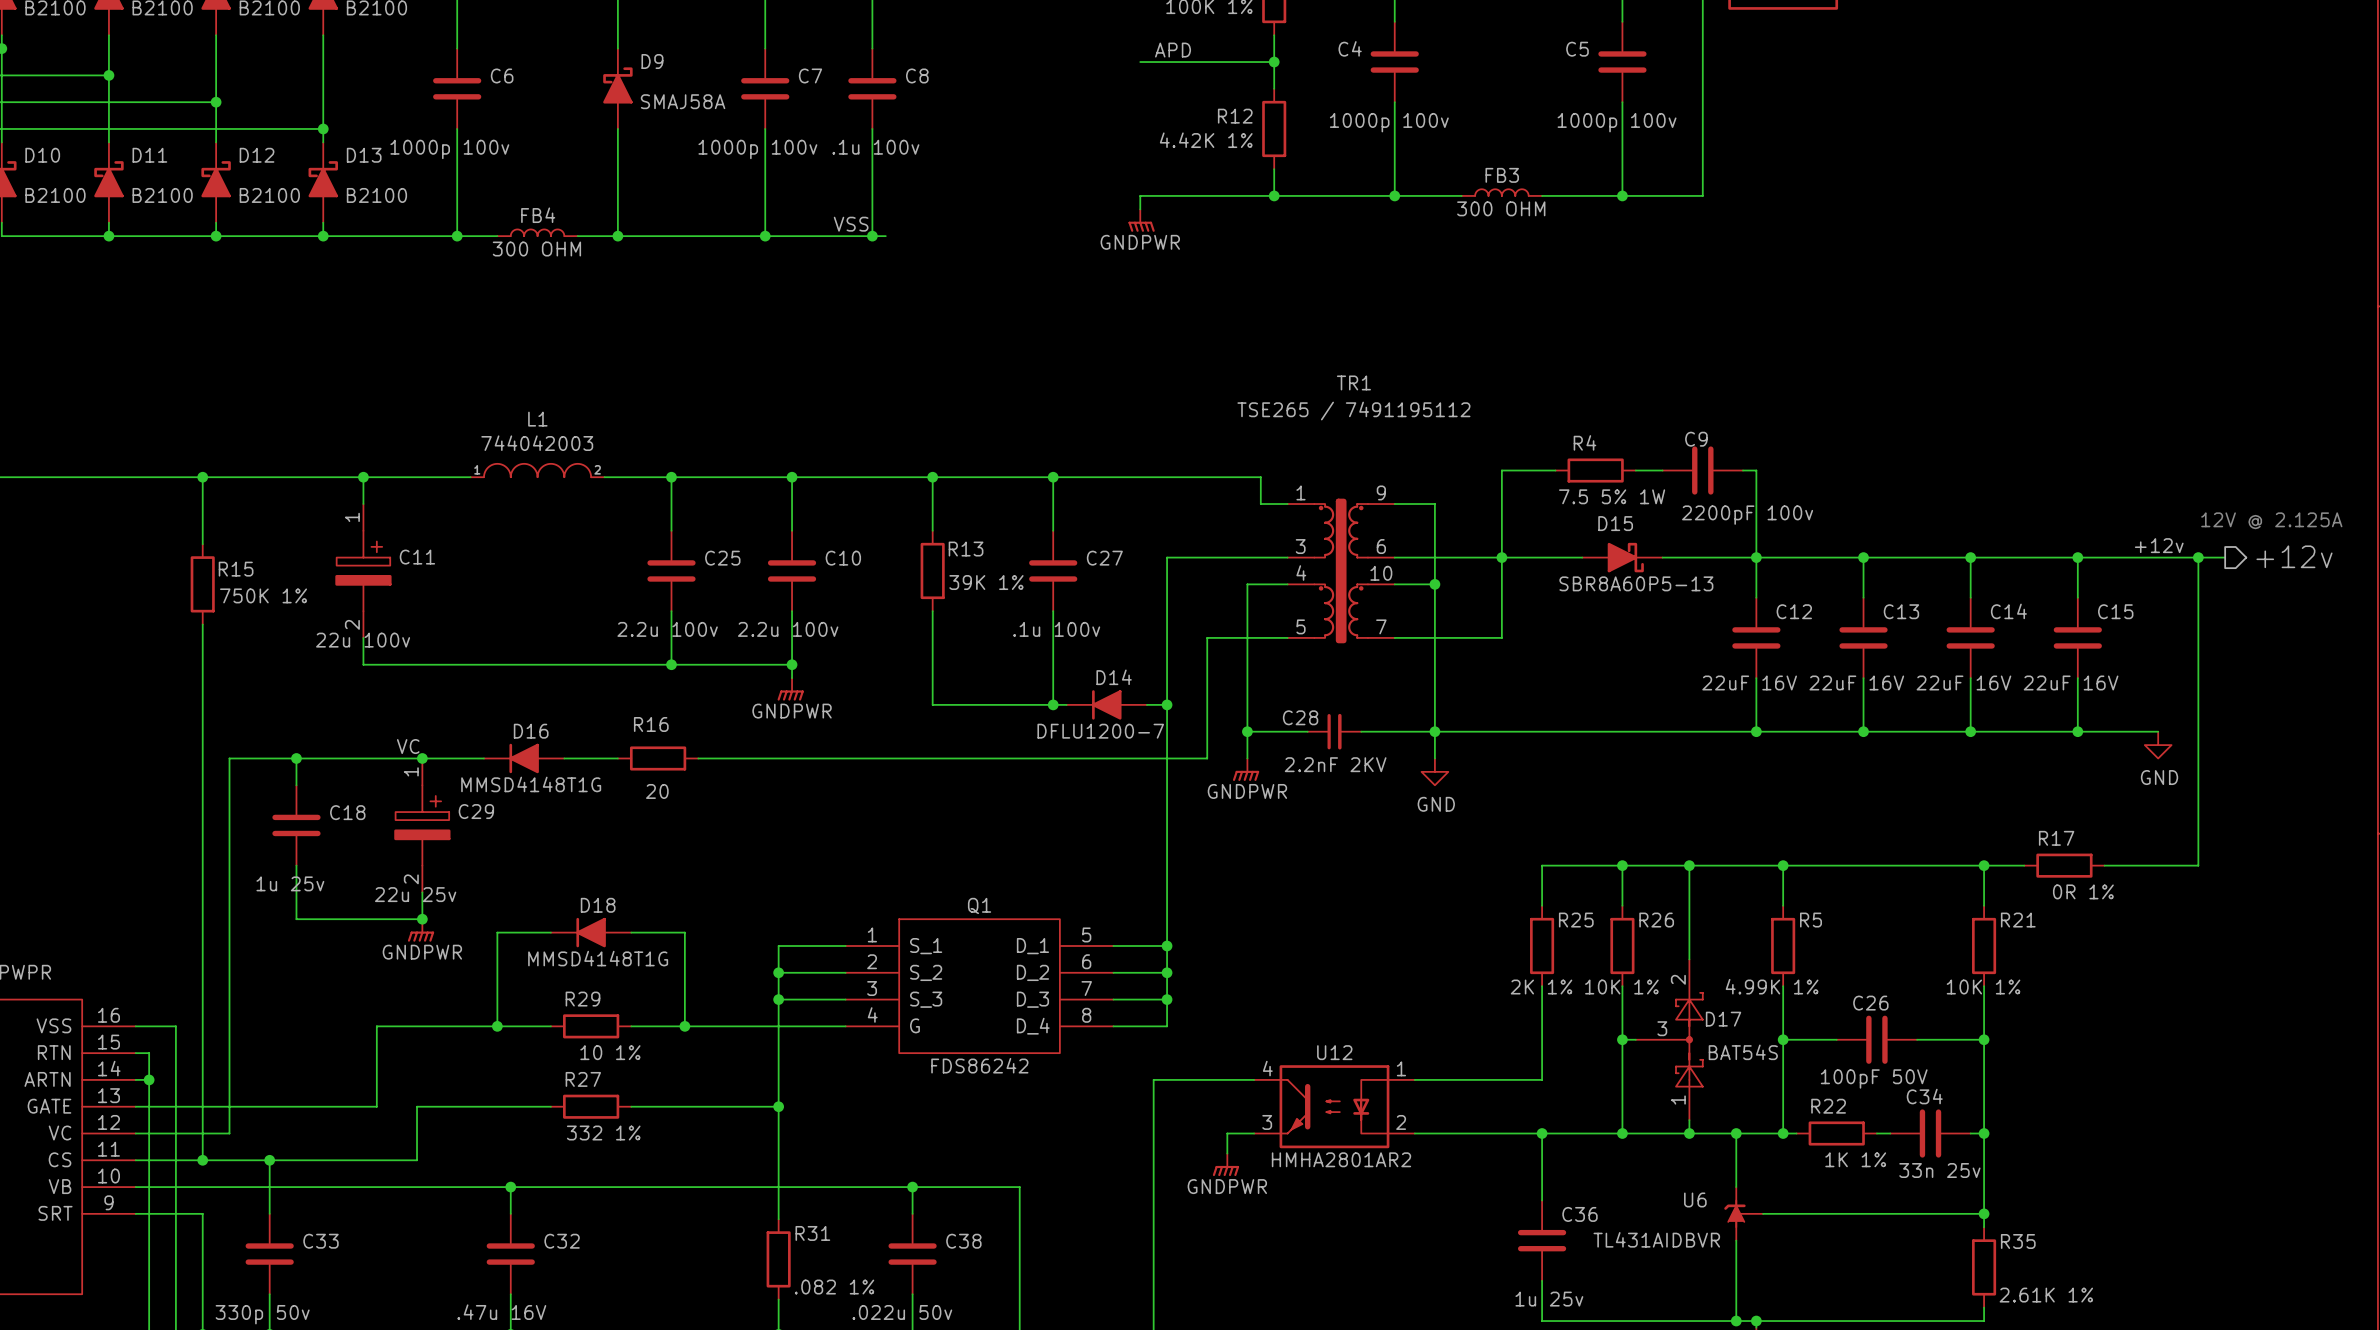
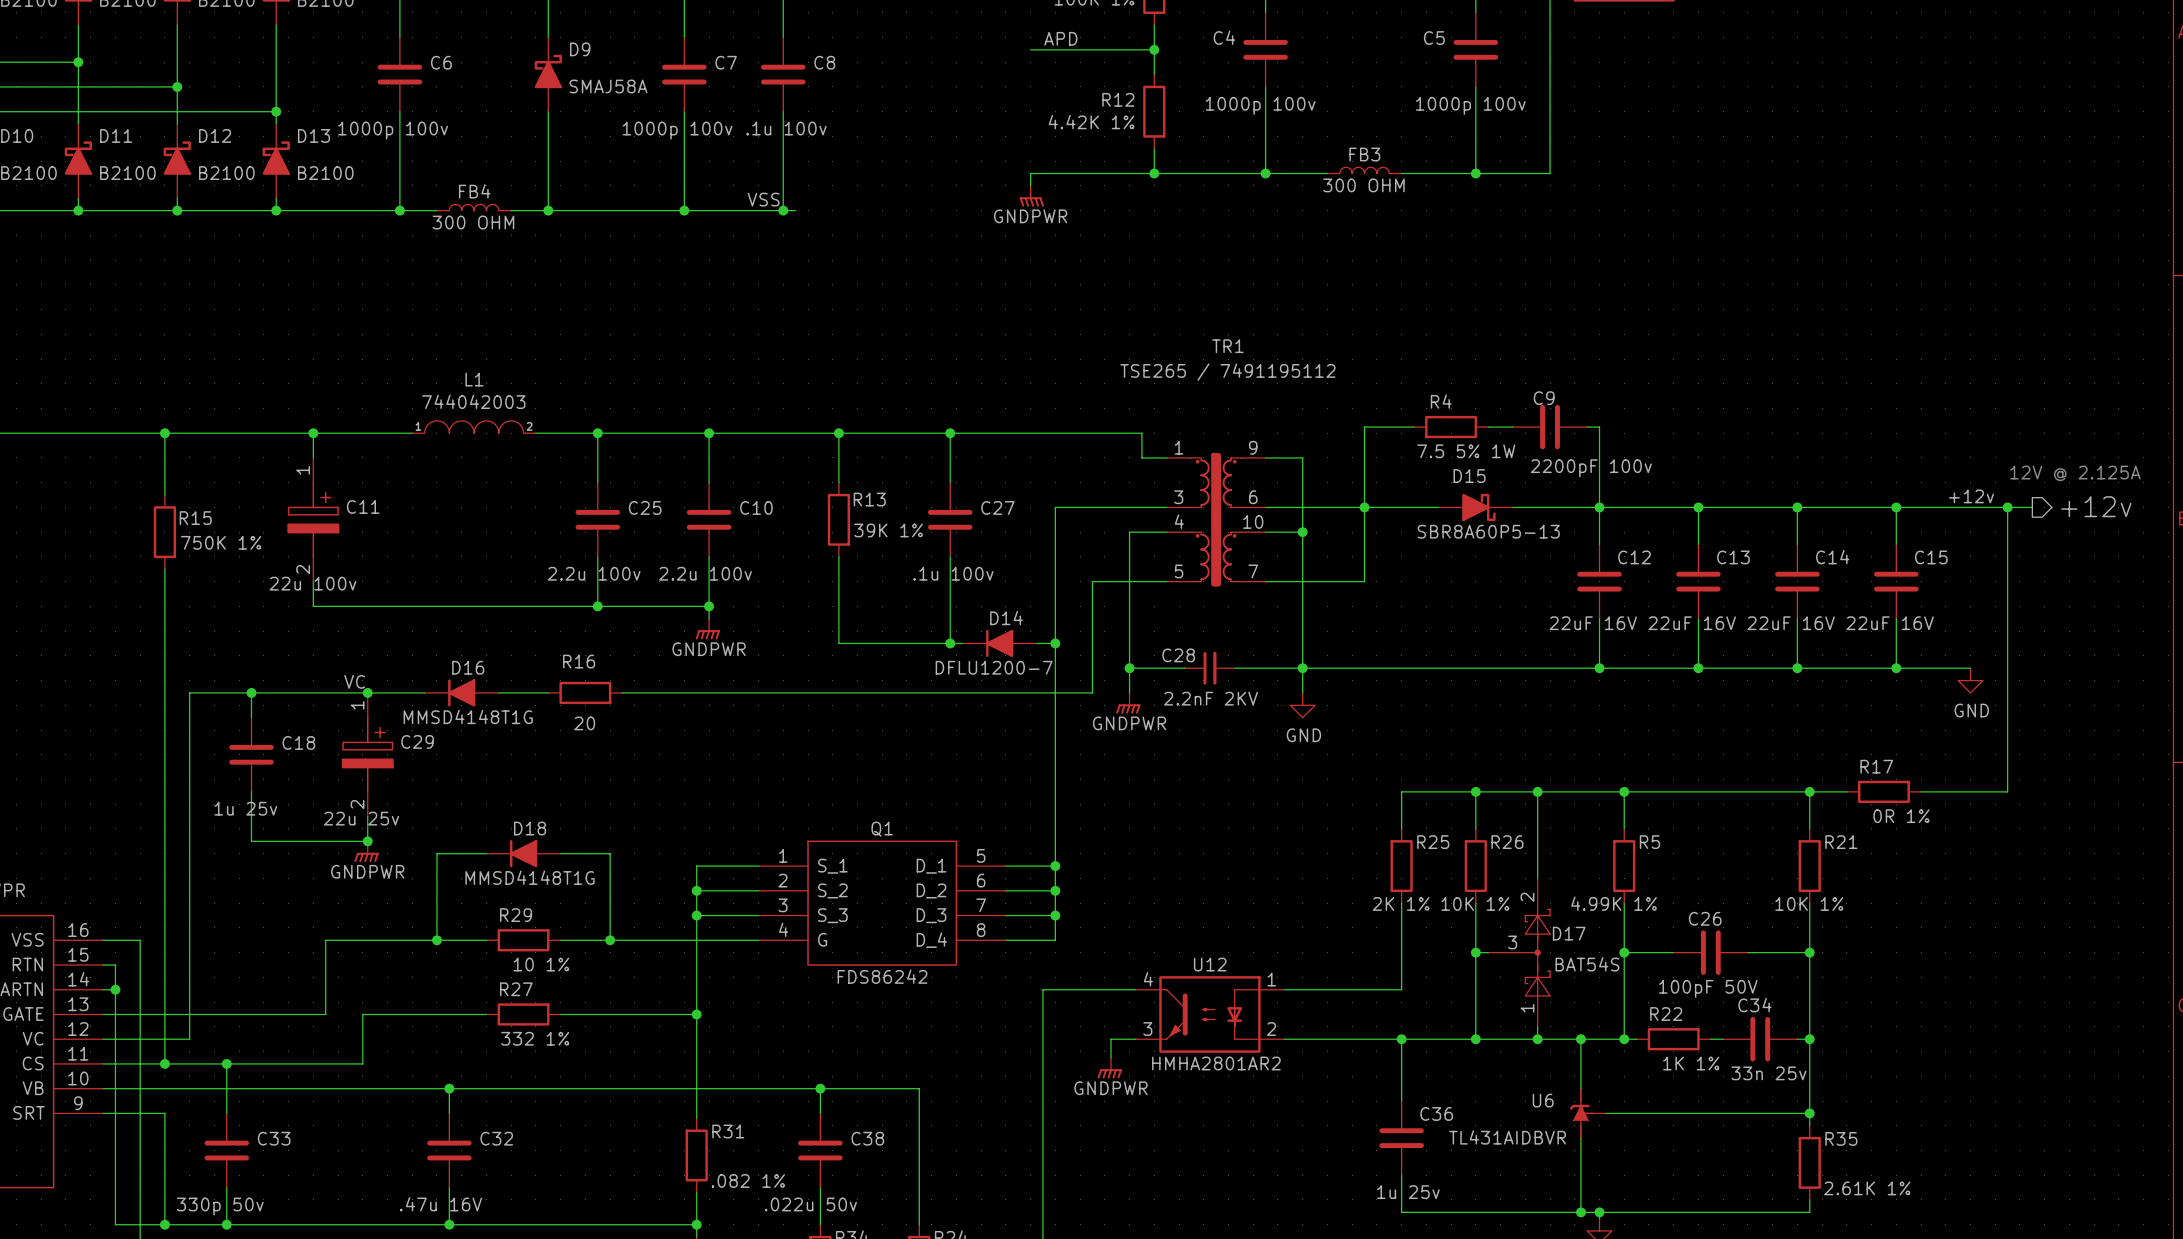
U6 symbol: [1724, 1187, 1764, 1241] -> [1569, 1088, 1606, 1139]

